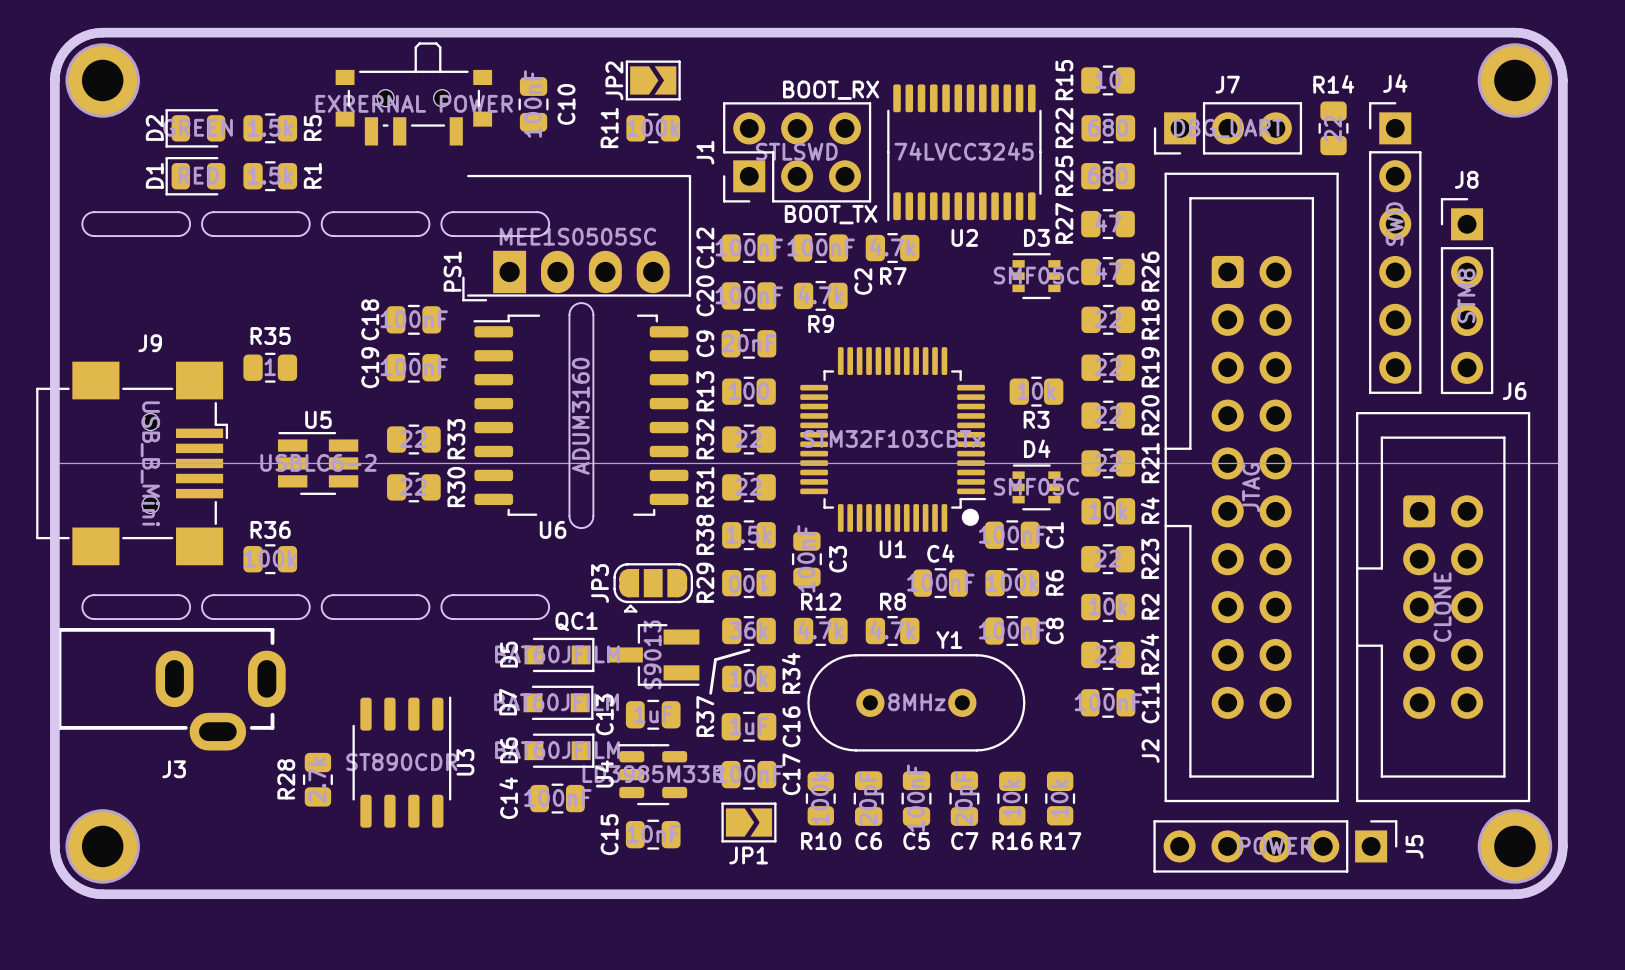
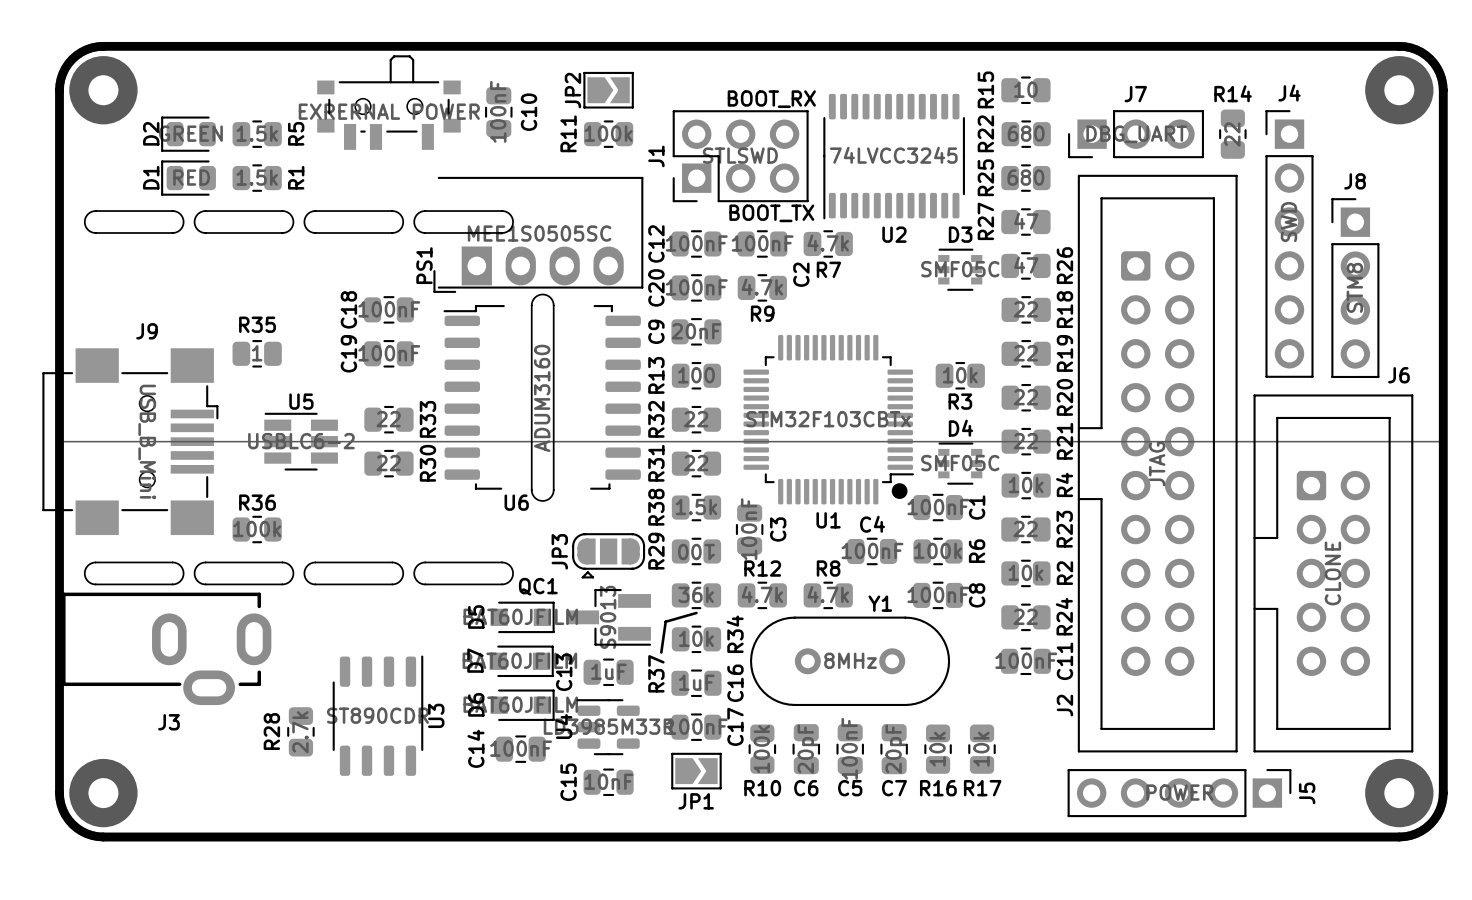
drawing: none -> [71, 57, 136, 123]
drawing: none -> [1367, 57, 1432, 123]
drawing: none -> [71, 760, 136, 826]
drawing: none -> [1367, 760, 1432, 826]

